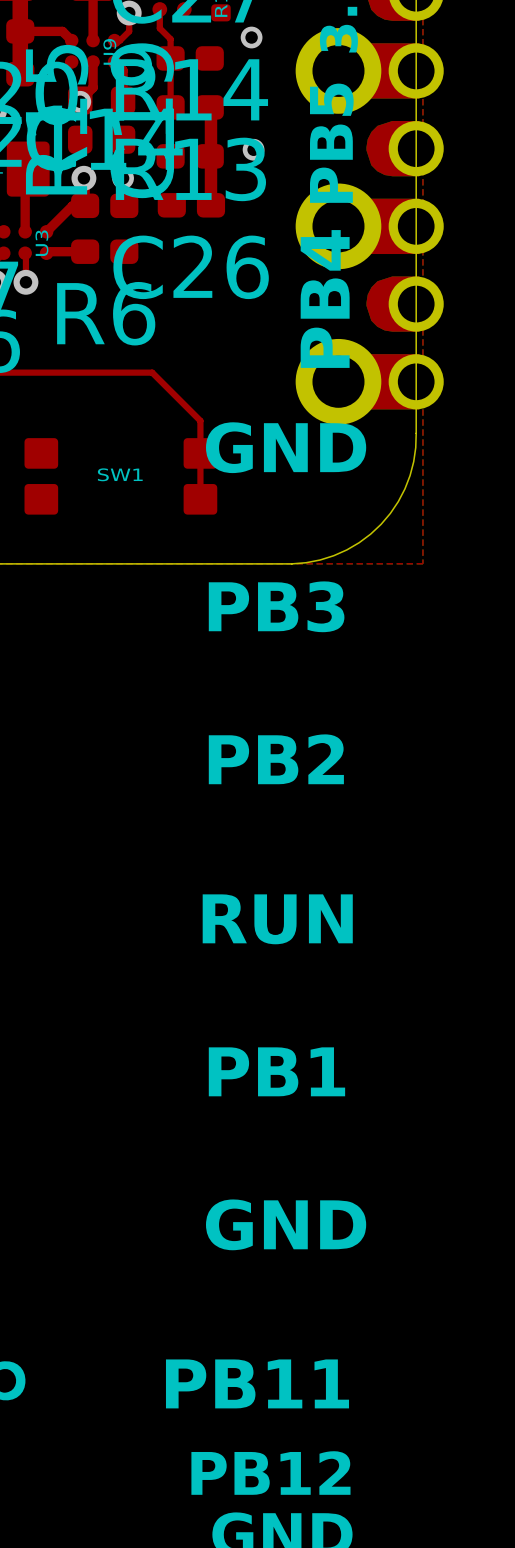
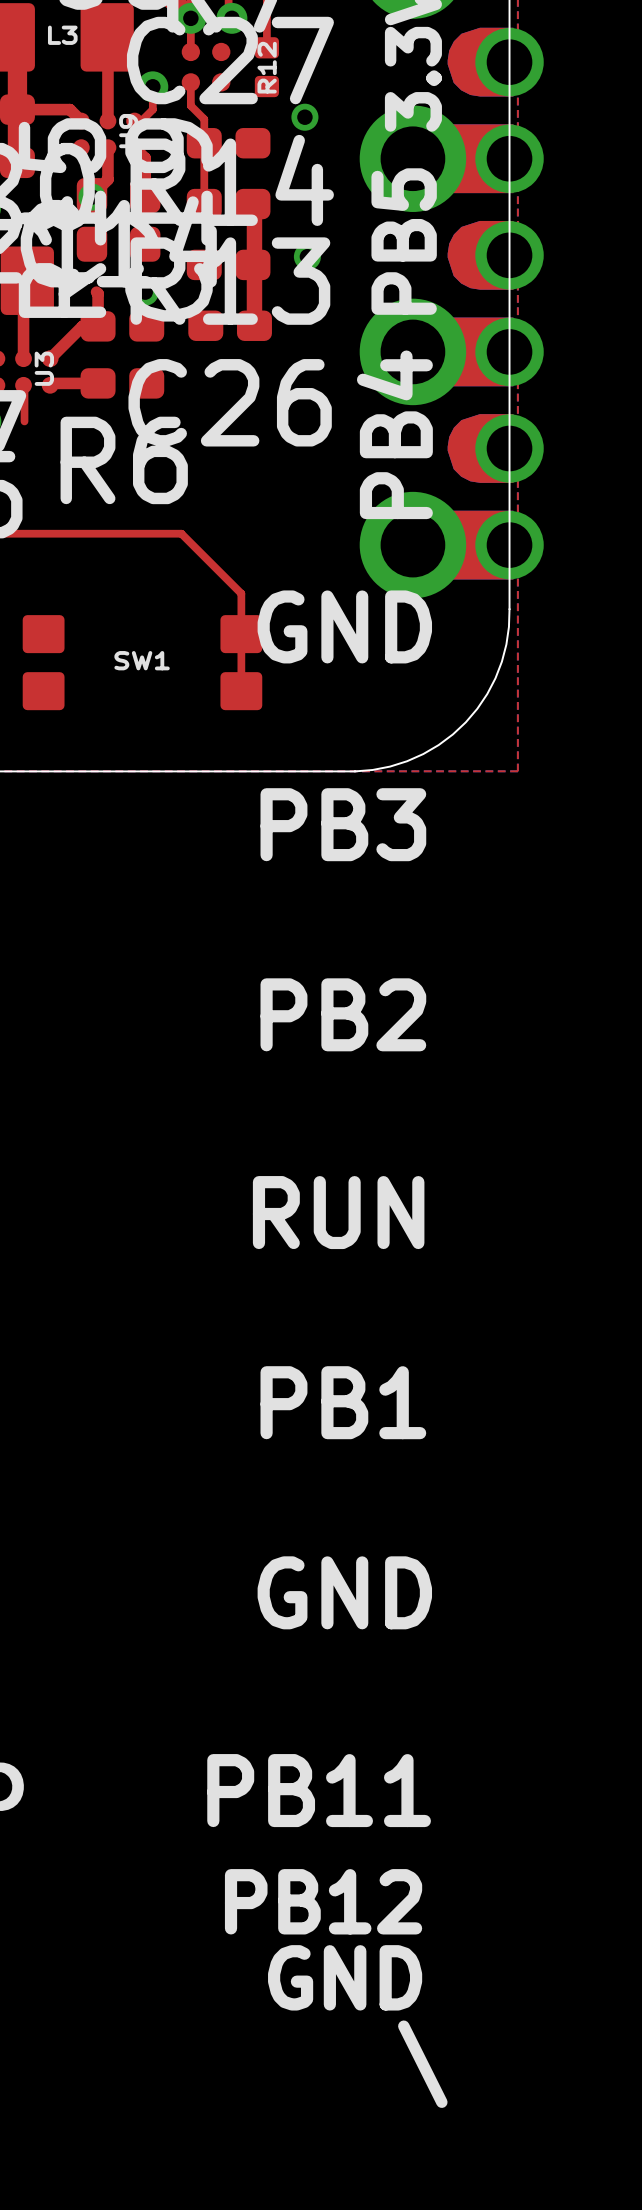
via: (83, 178) -> none
via: (25, 282) -> none

